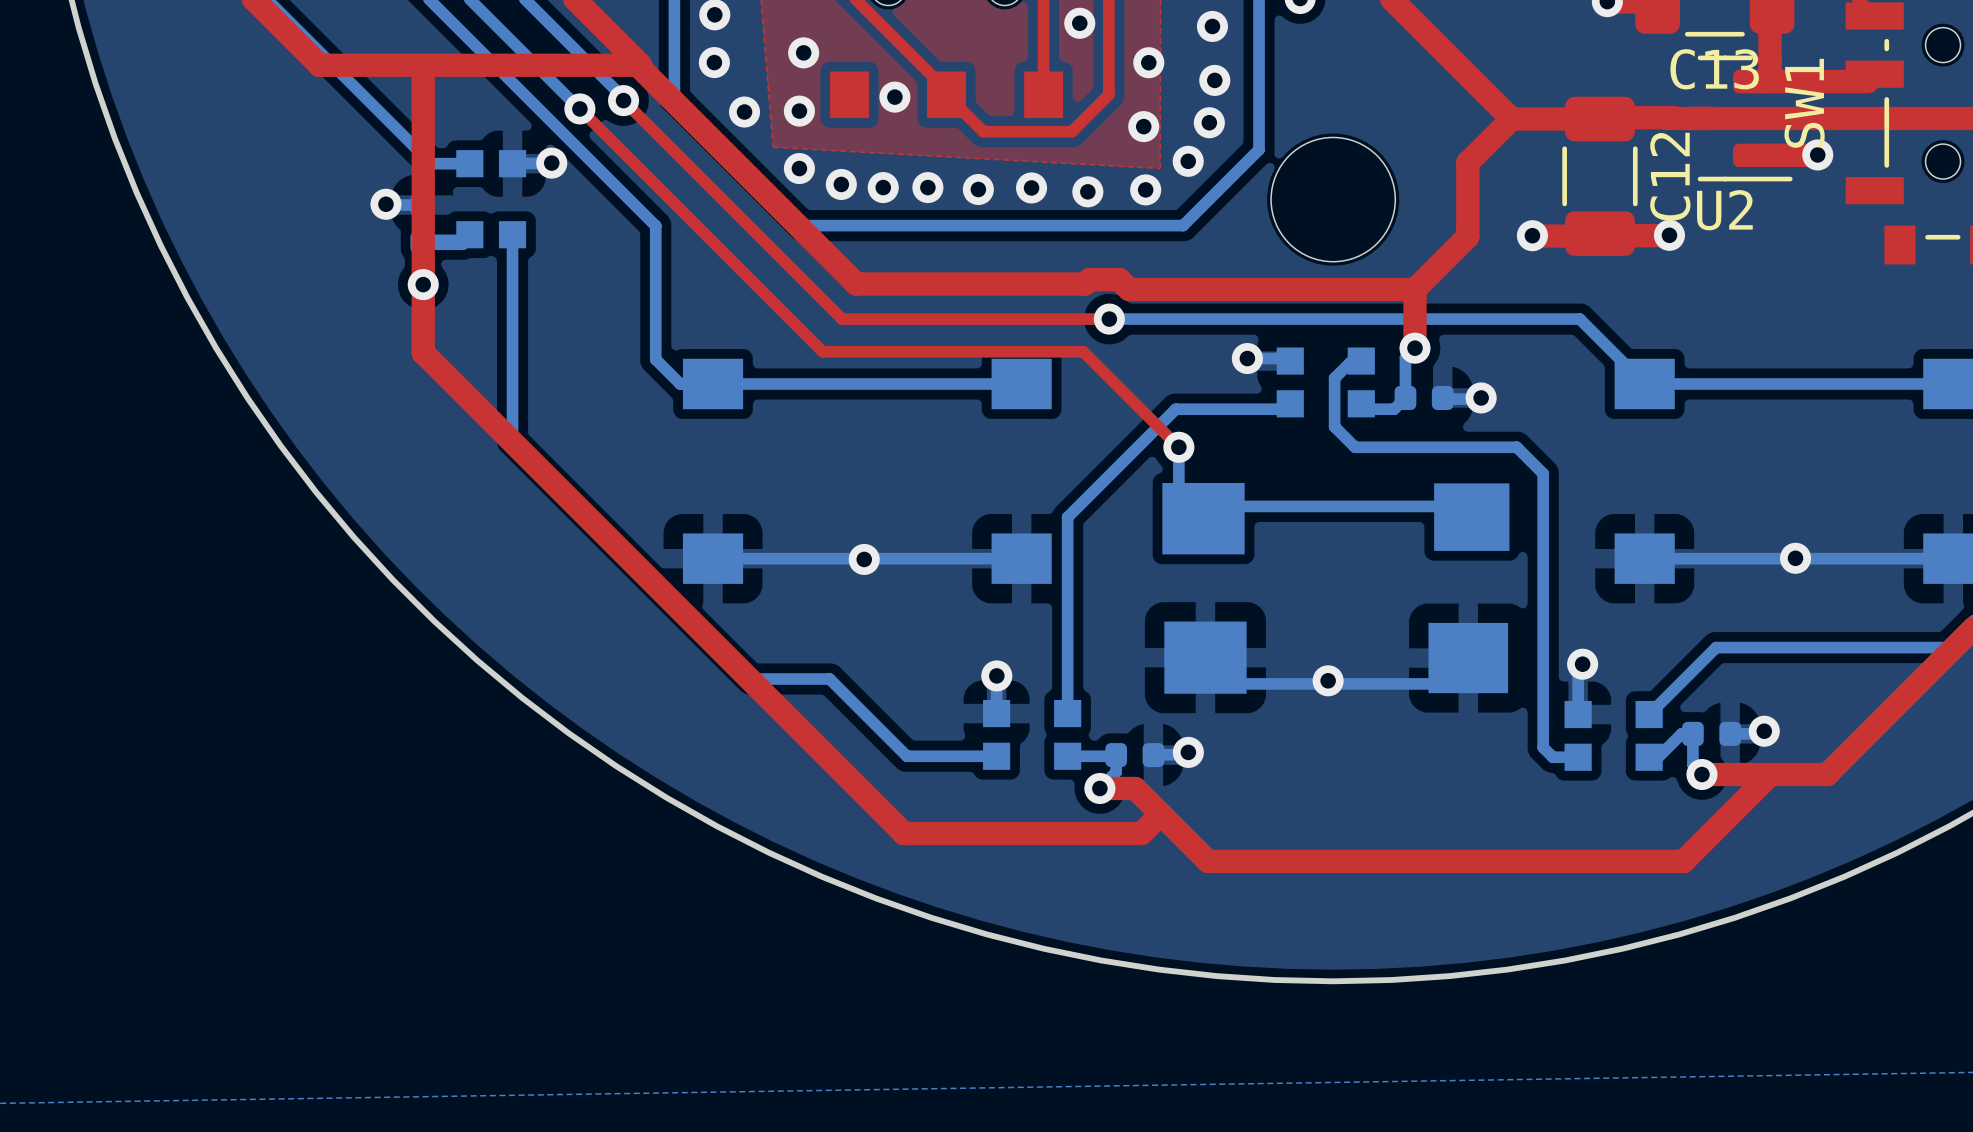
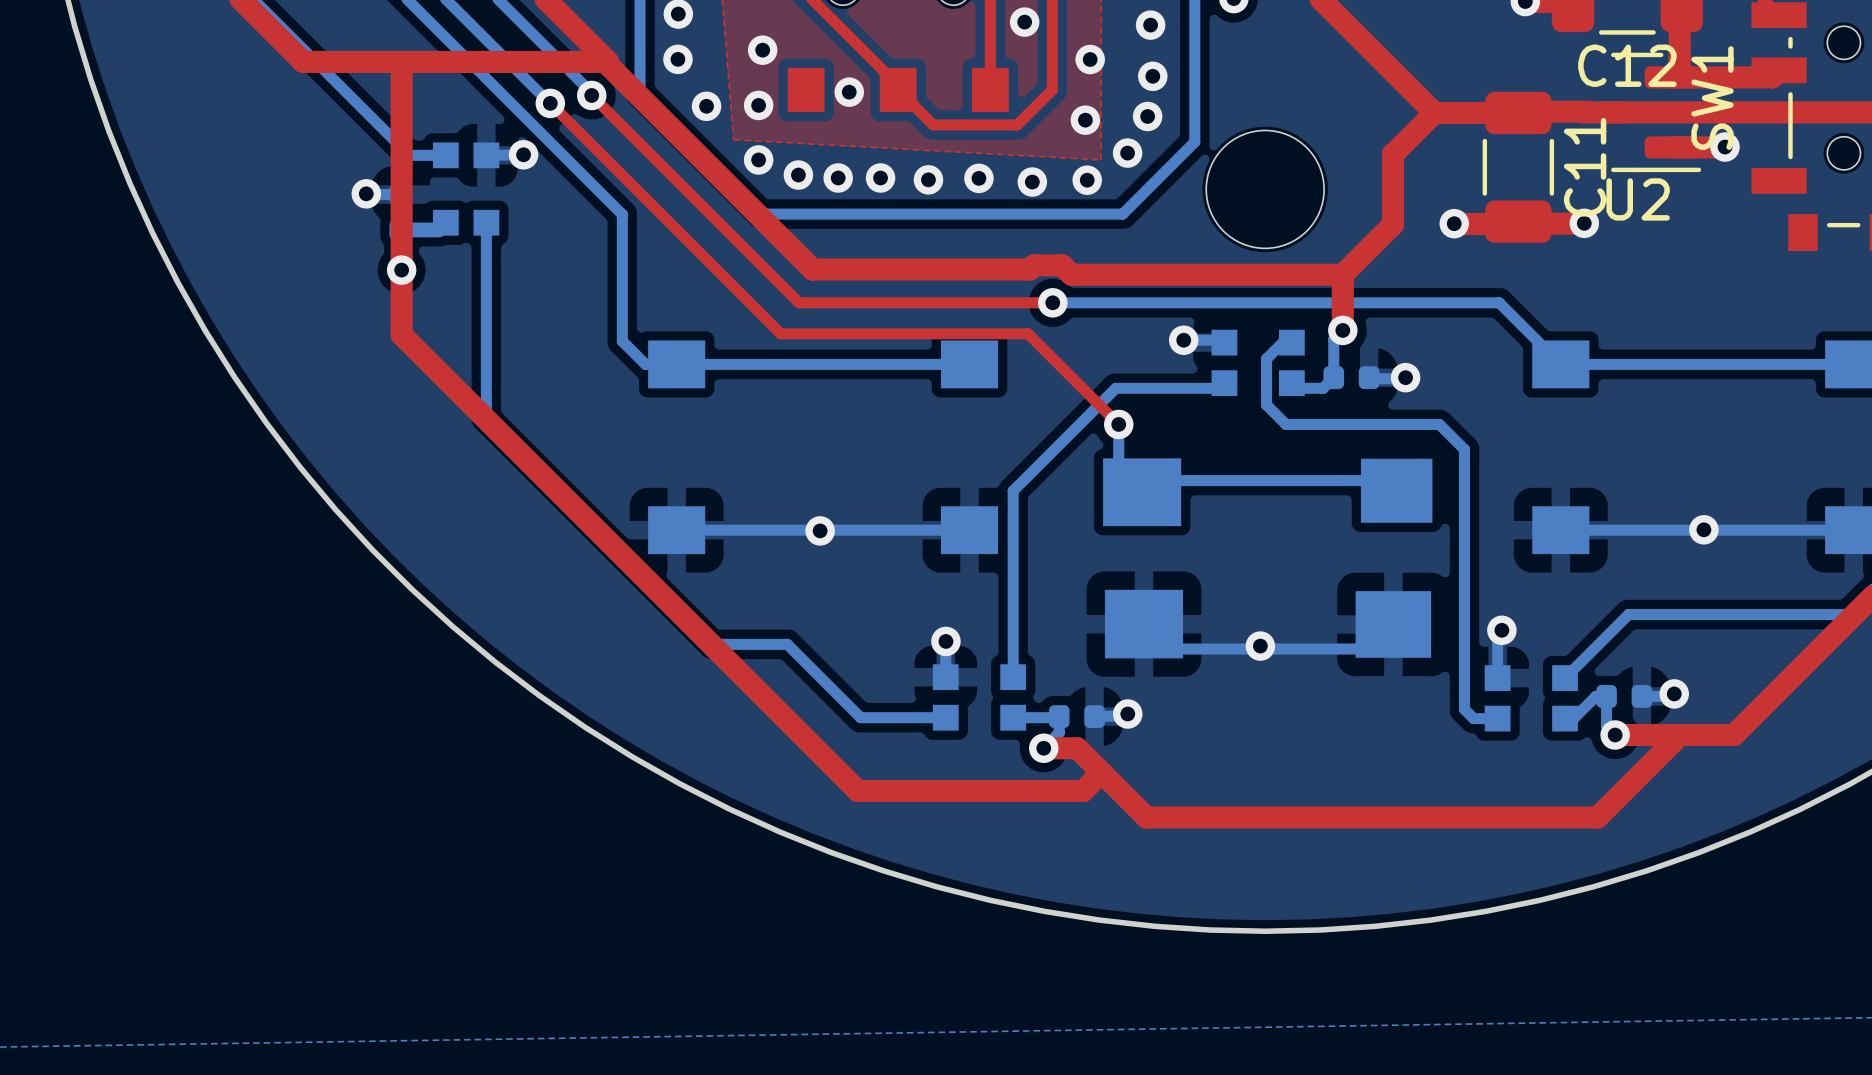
C13 name: C13 (1714, 69) -> C12 (1627, 65)
C12 name: C12 (1670, 176) -> C11 (1585, 167)

